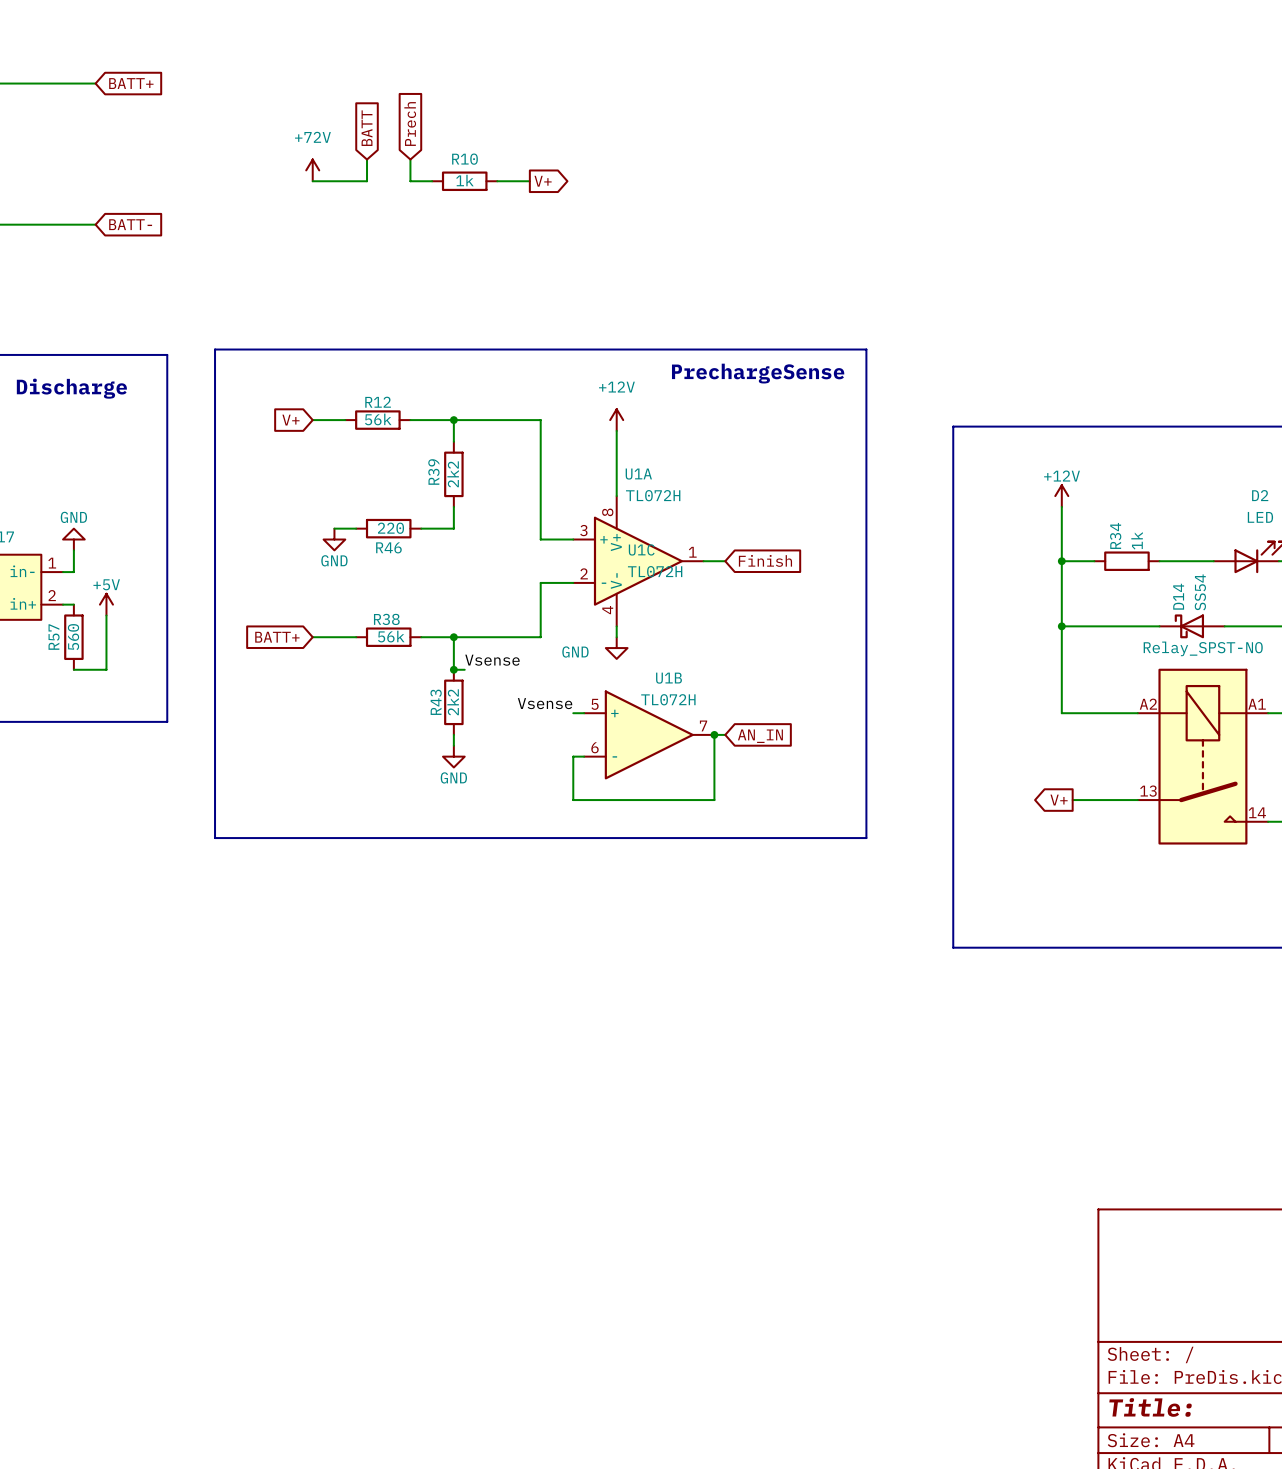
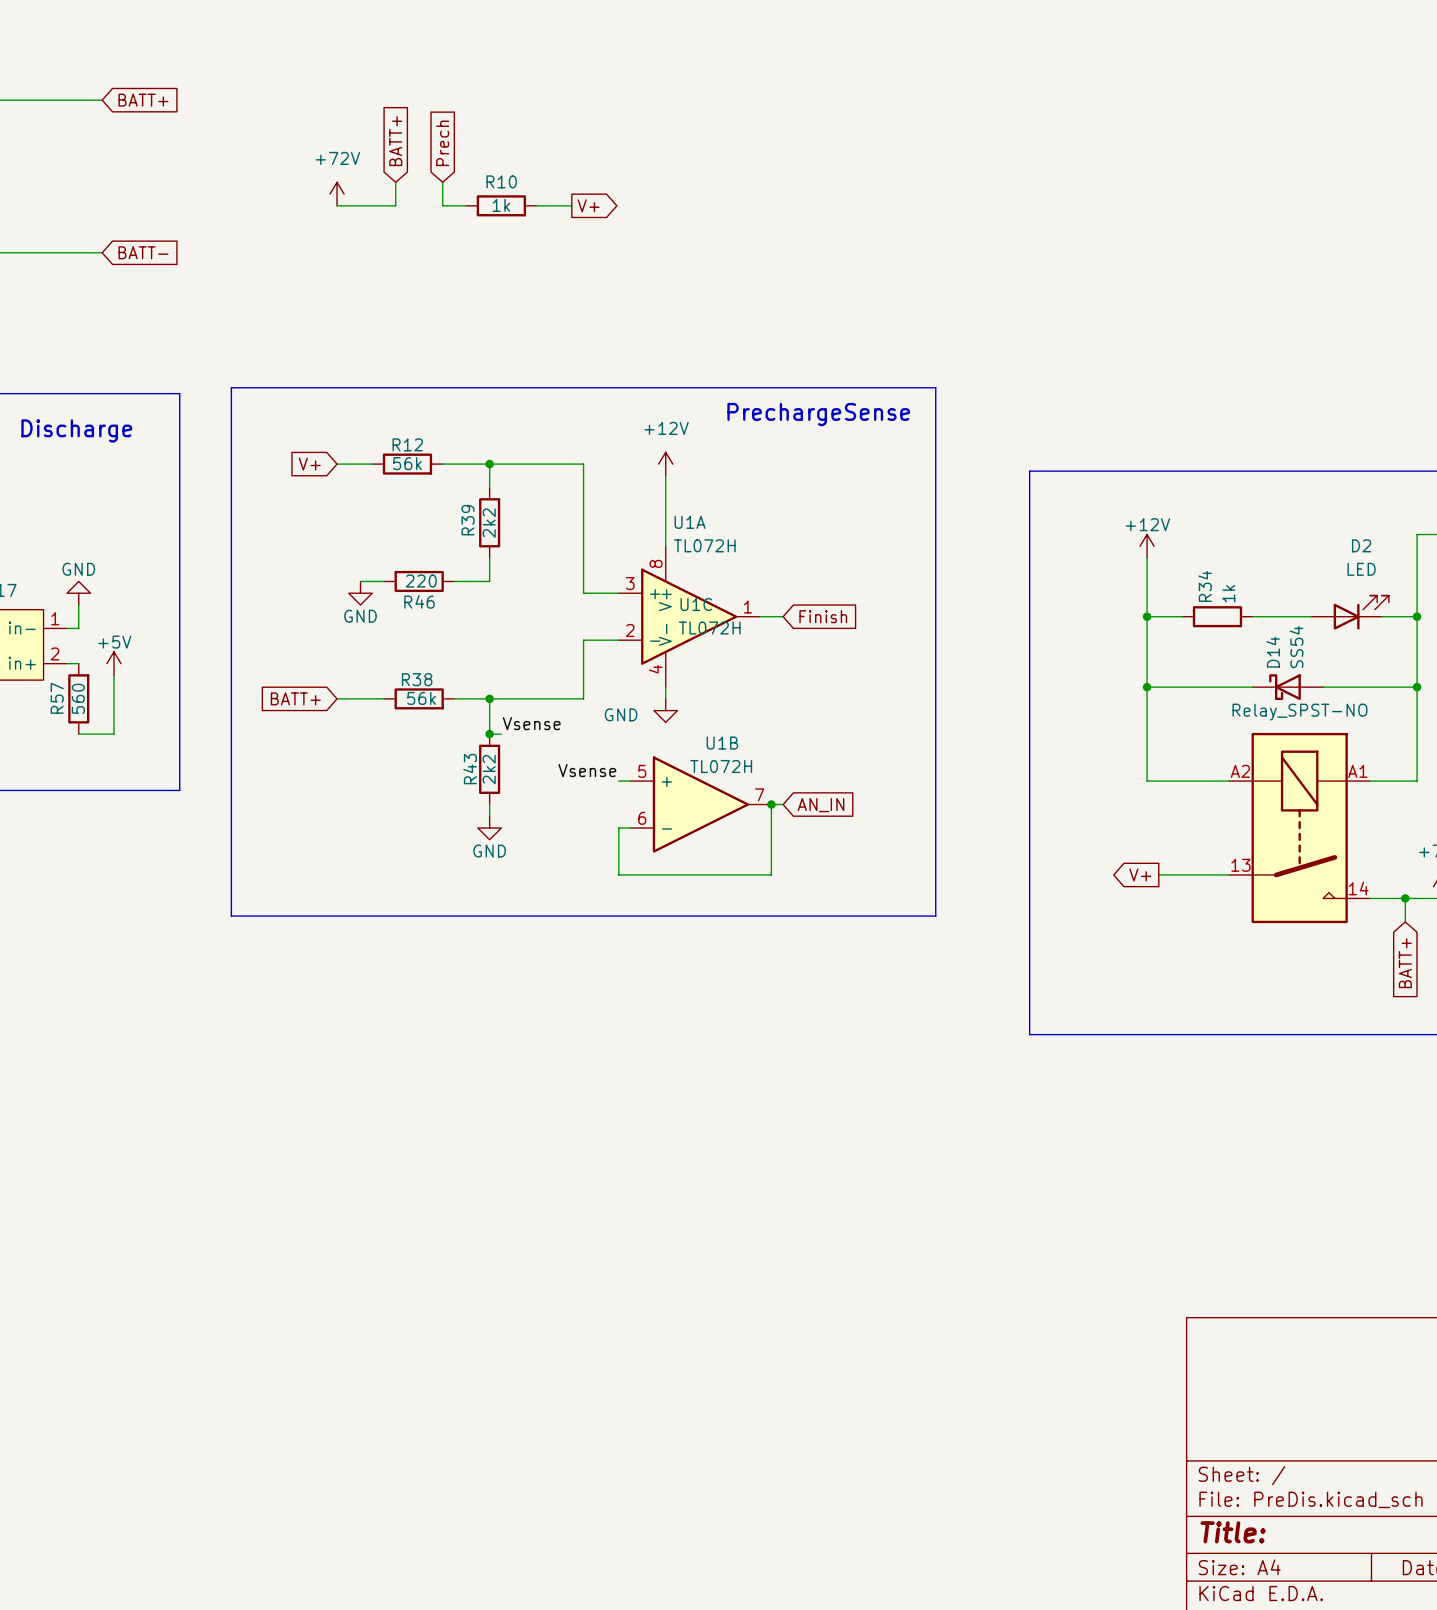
global label: BATT (367, 128) -> BATT+ (395, 141)

